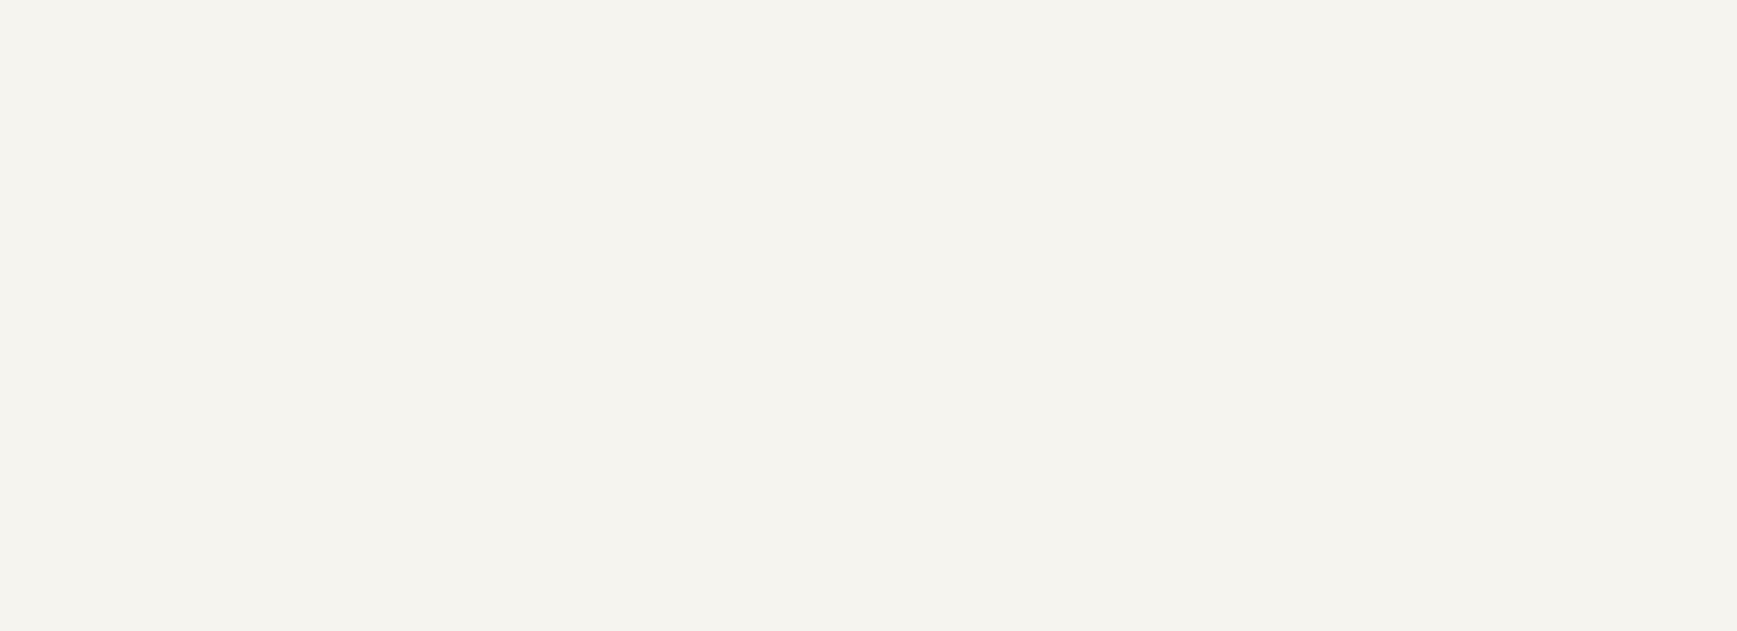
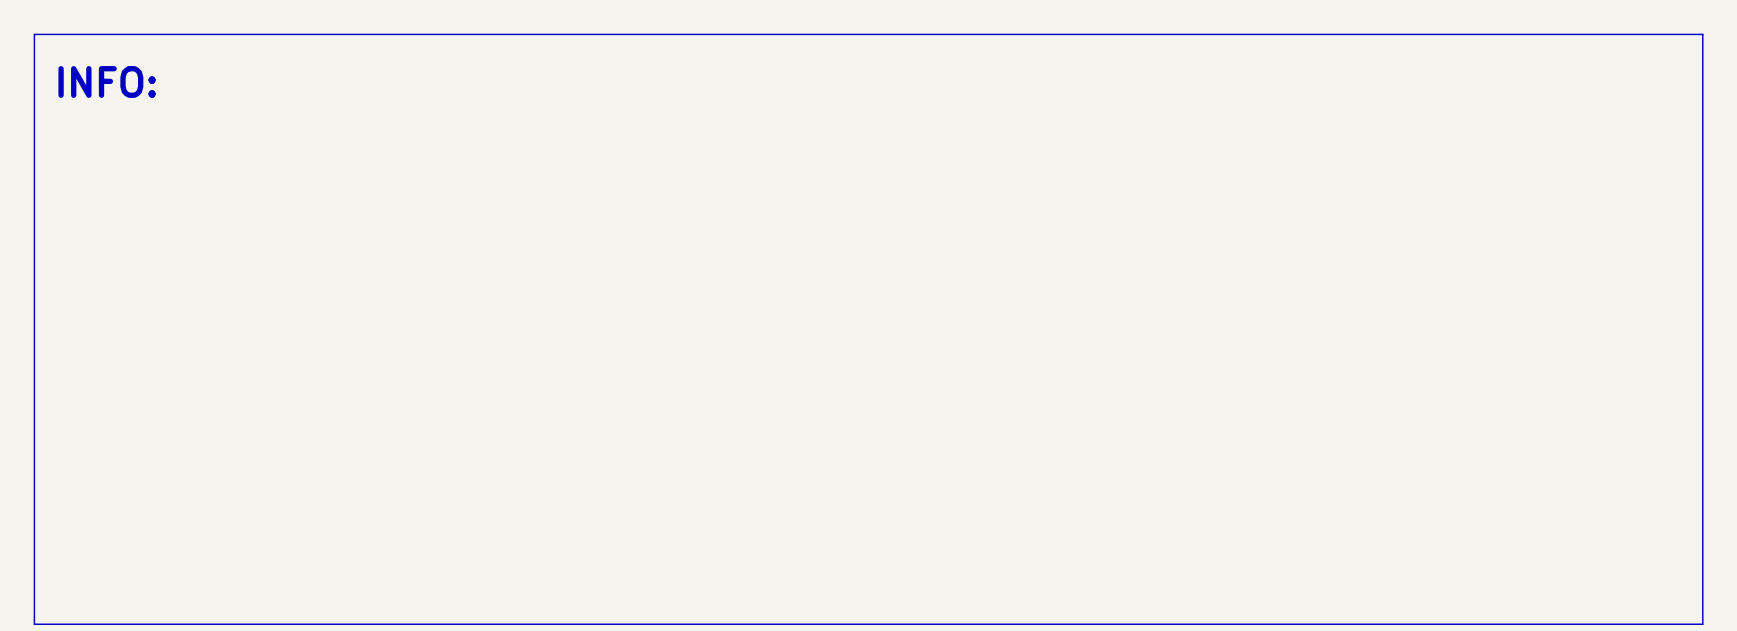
line: none -> (34, 34) (34, 624) (1702, 624) (1702, 34) (34, 34)
text: none -> INFO: (107, 81)

